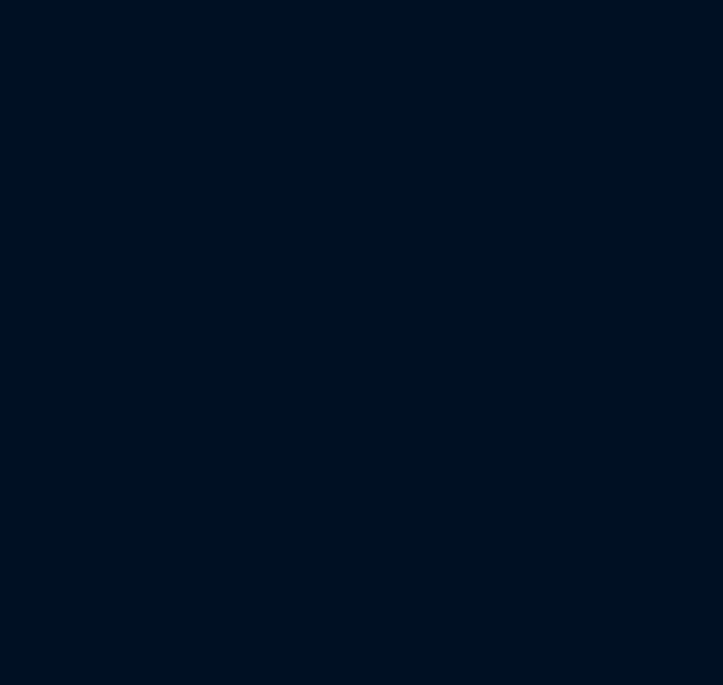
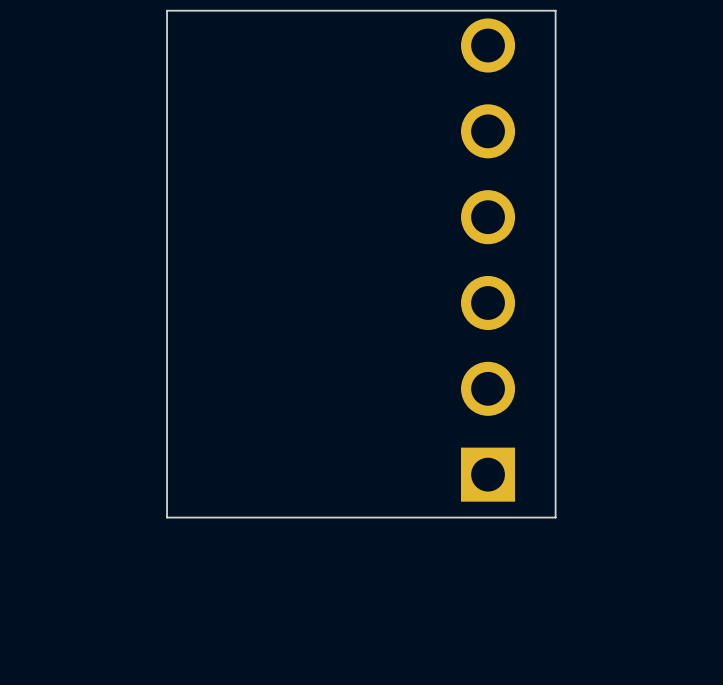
part: none -> (361, 264)

